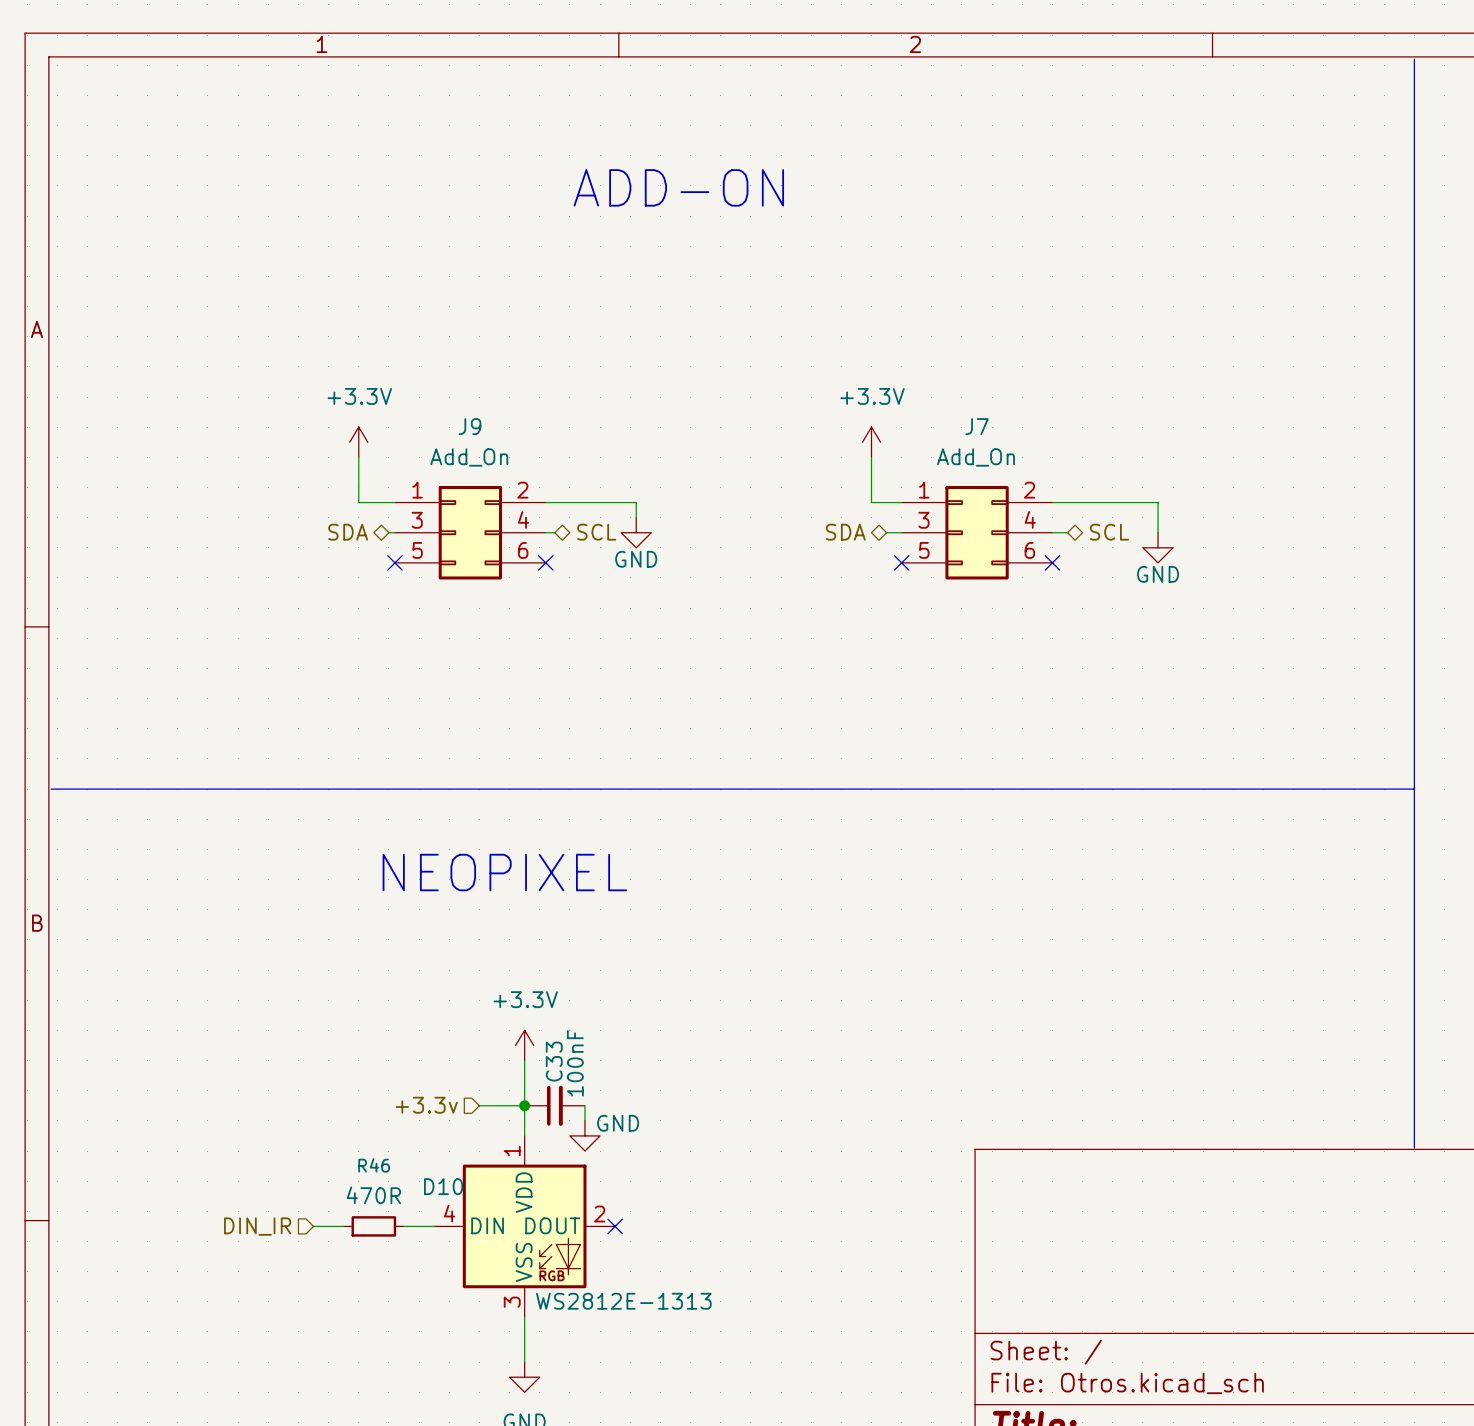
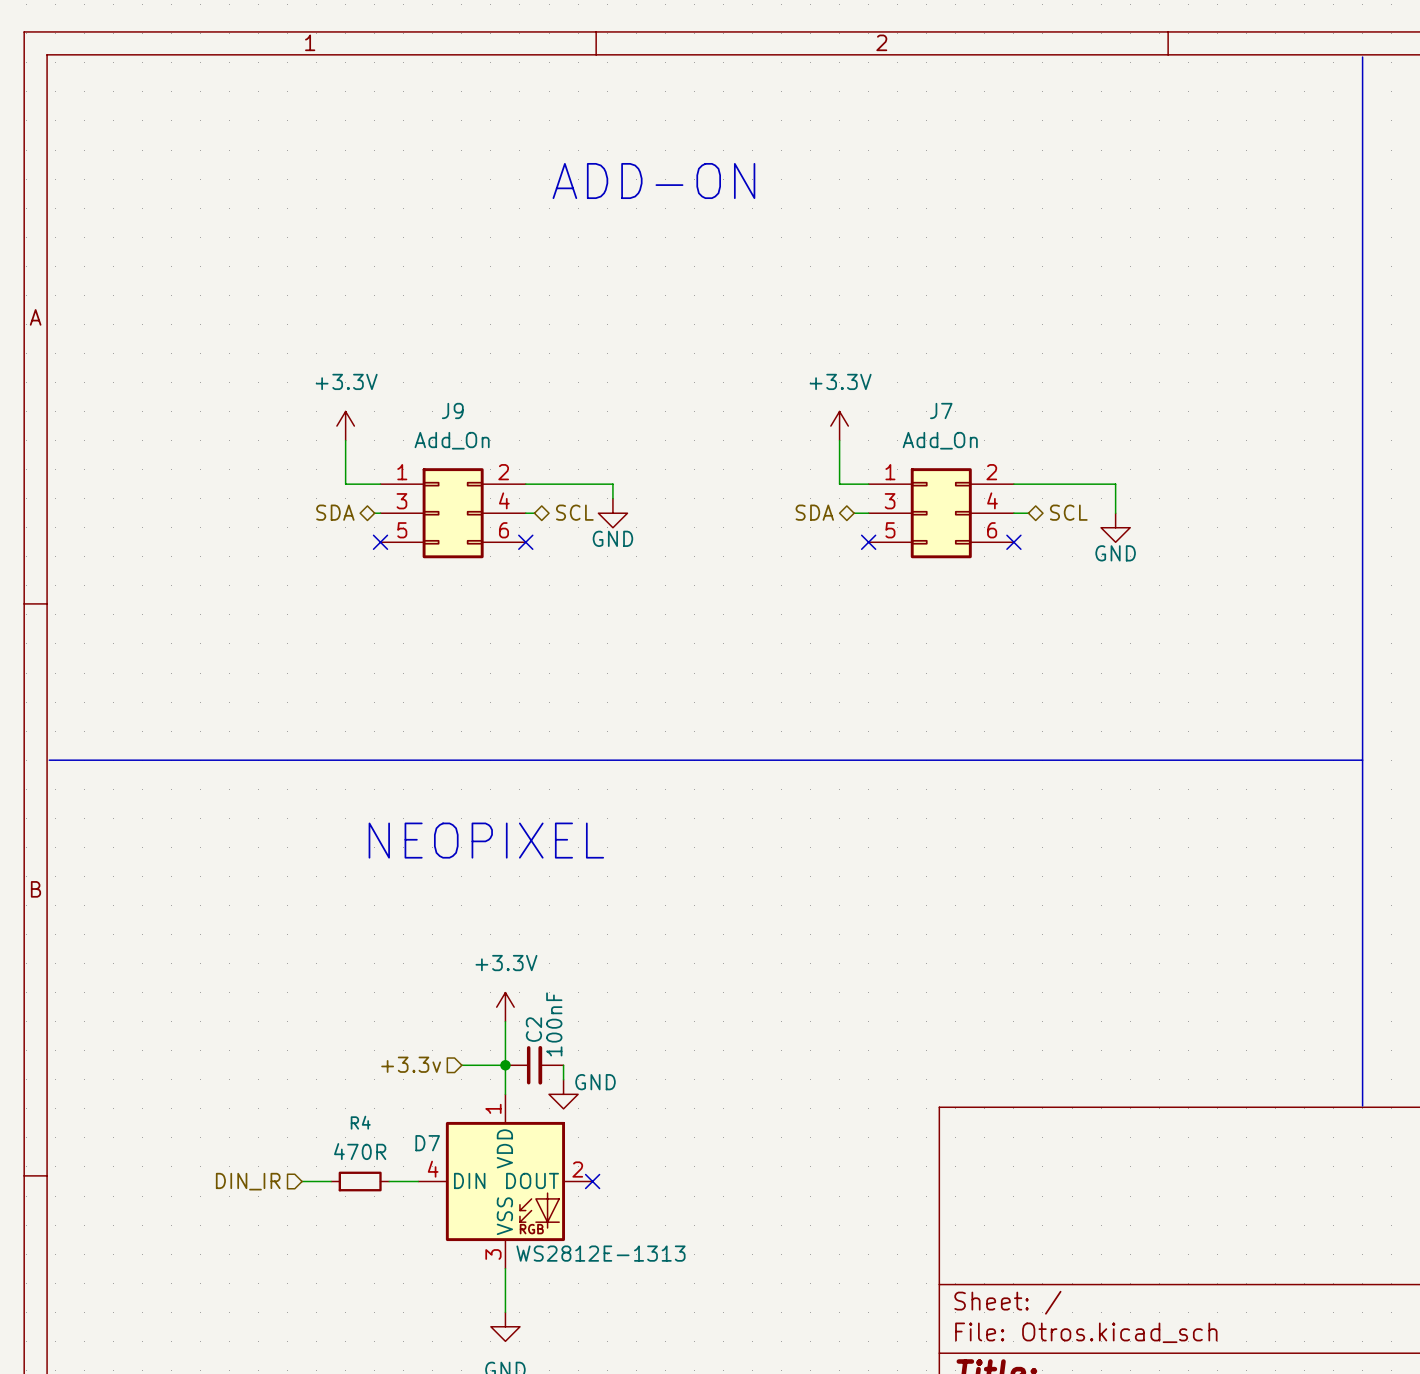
C33 name: C33 (554, 1061) -> C2 (533, 1029)
R46 name: R46 (374, 1165) -> R4 (360, 1122)
D10 name: D10 (443, 1186) -> D7 (427, 1143)

